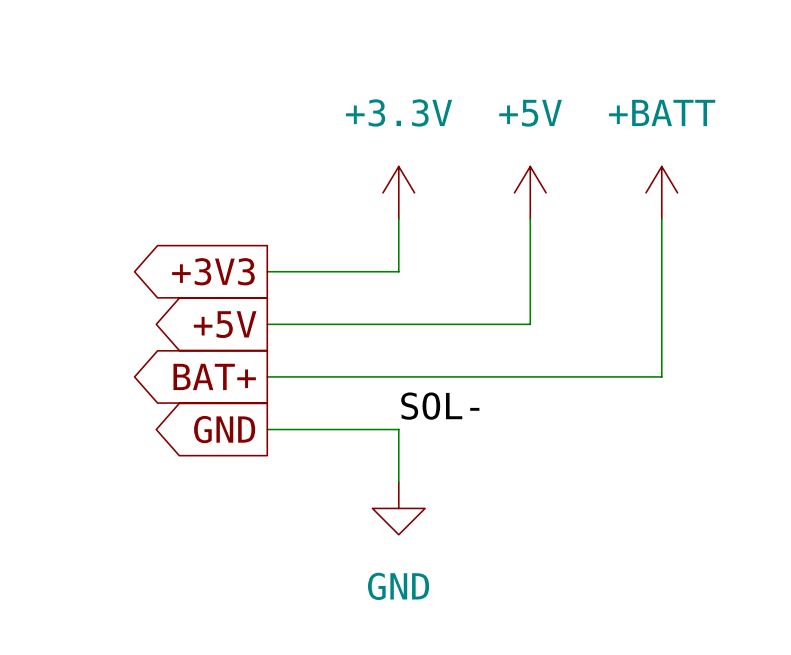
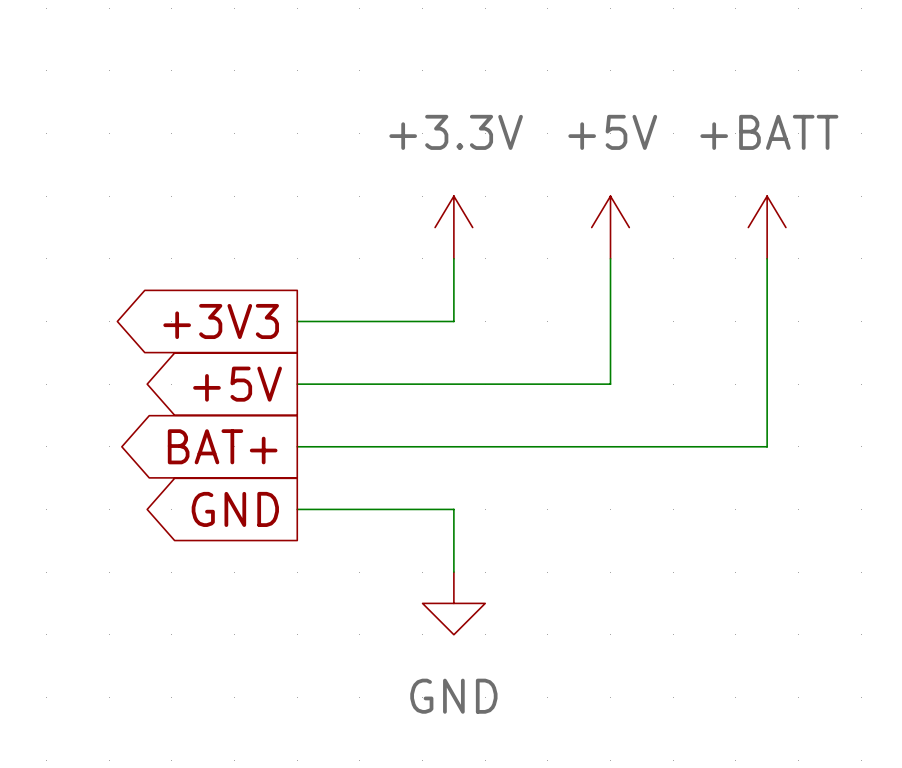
label: SOL- (440, 406) -> none

